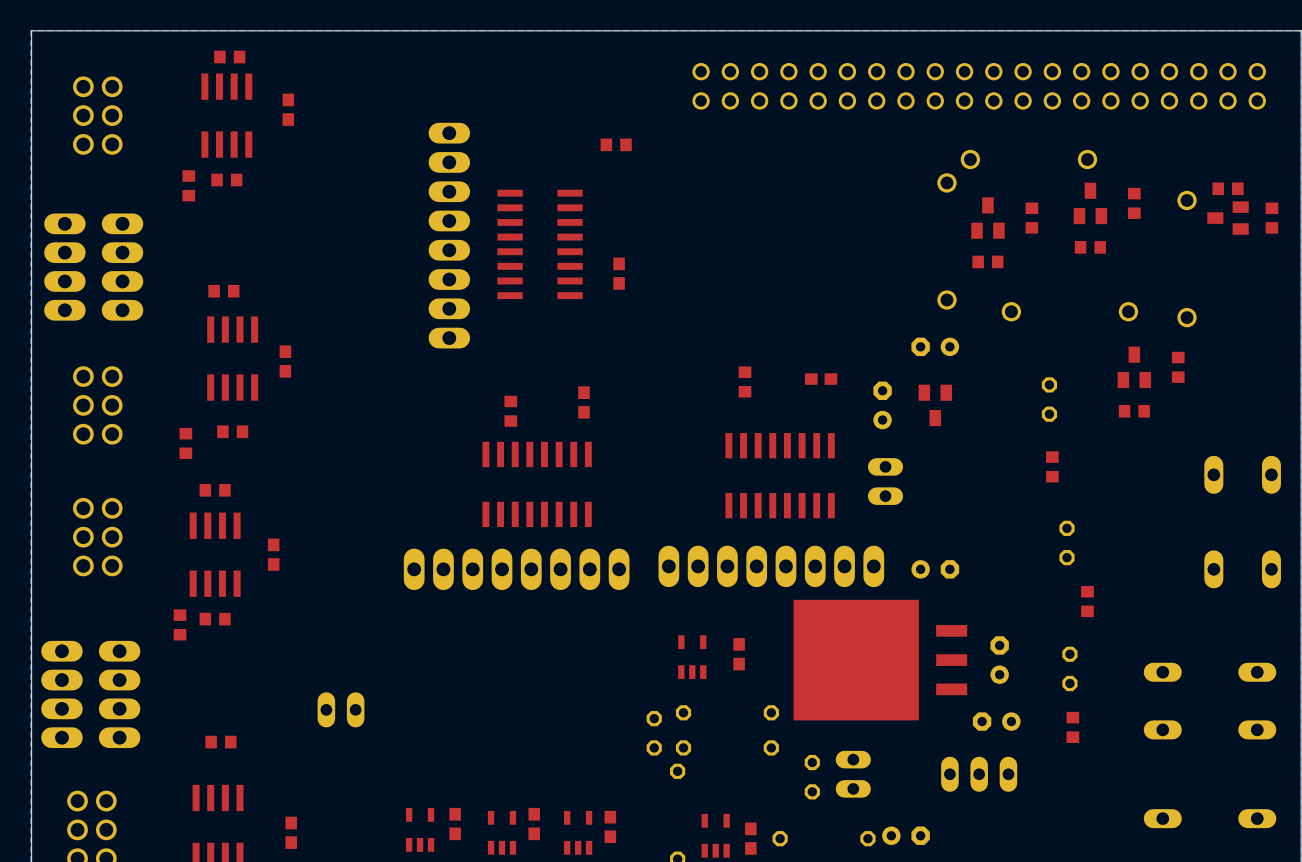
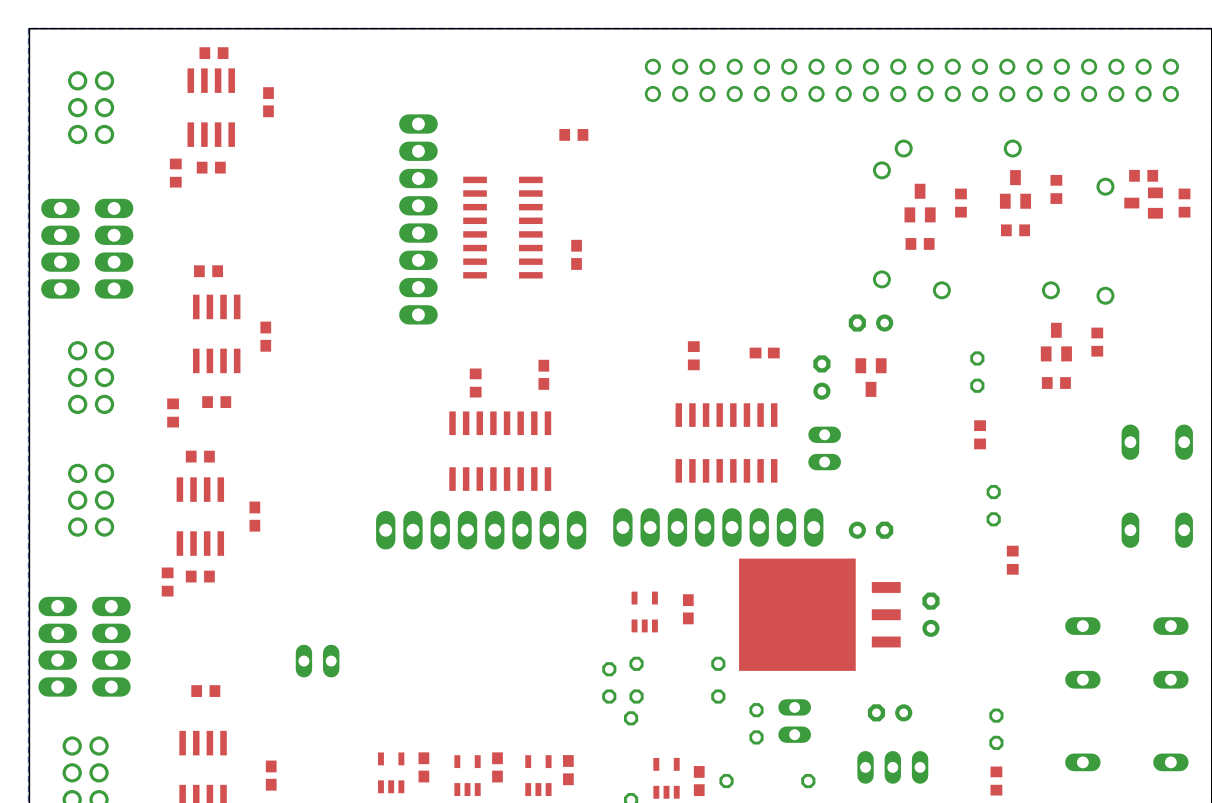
part position: (1069, 668) -> (996, 729)
part: (996, 721) -> none
part position: (1072, 727) -> (996, 781)
part: none -> (890, 712)
part position: (979, 774) -> (892, 767)
part: (906, 835) -> none

